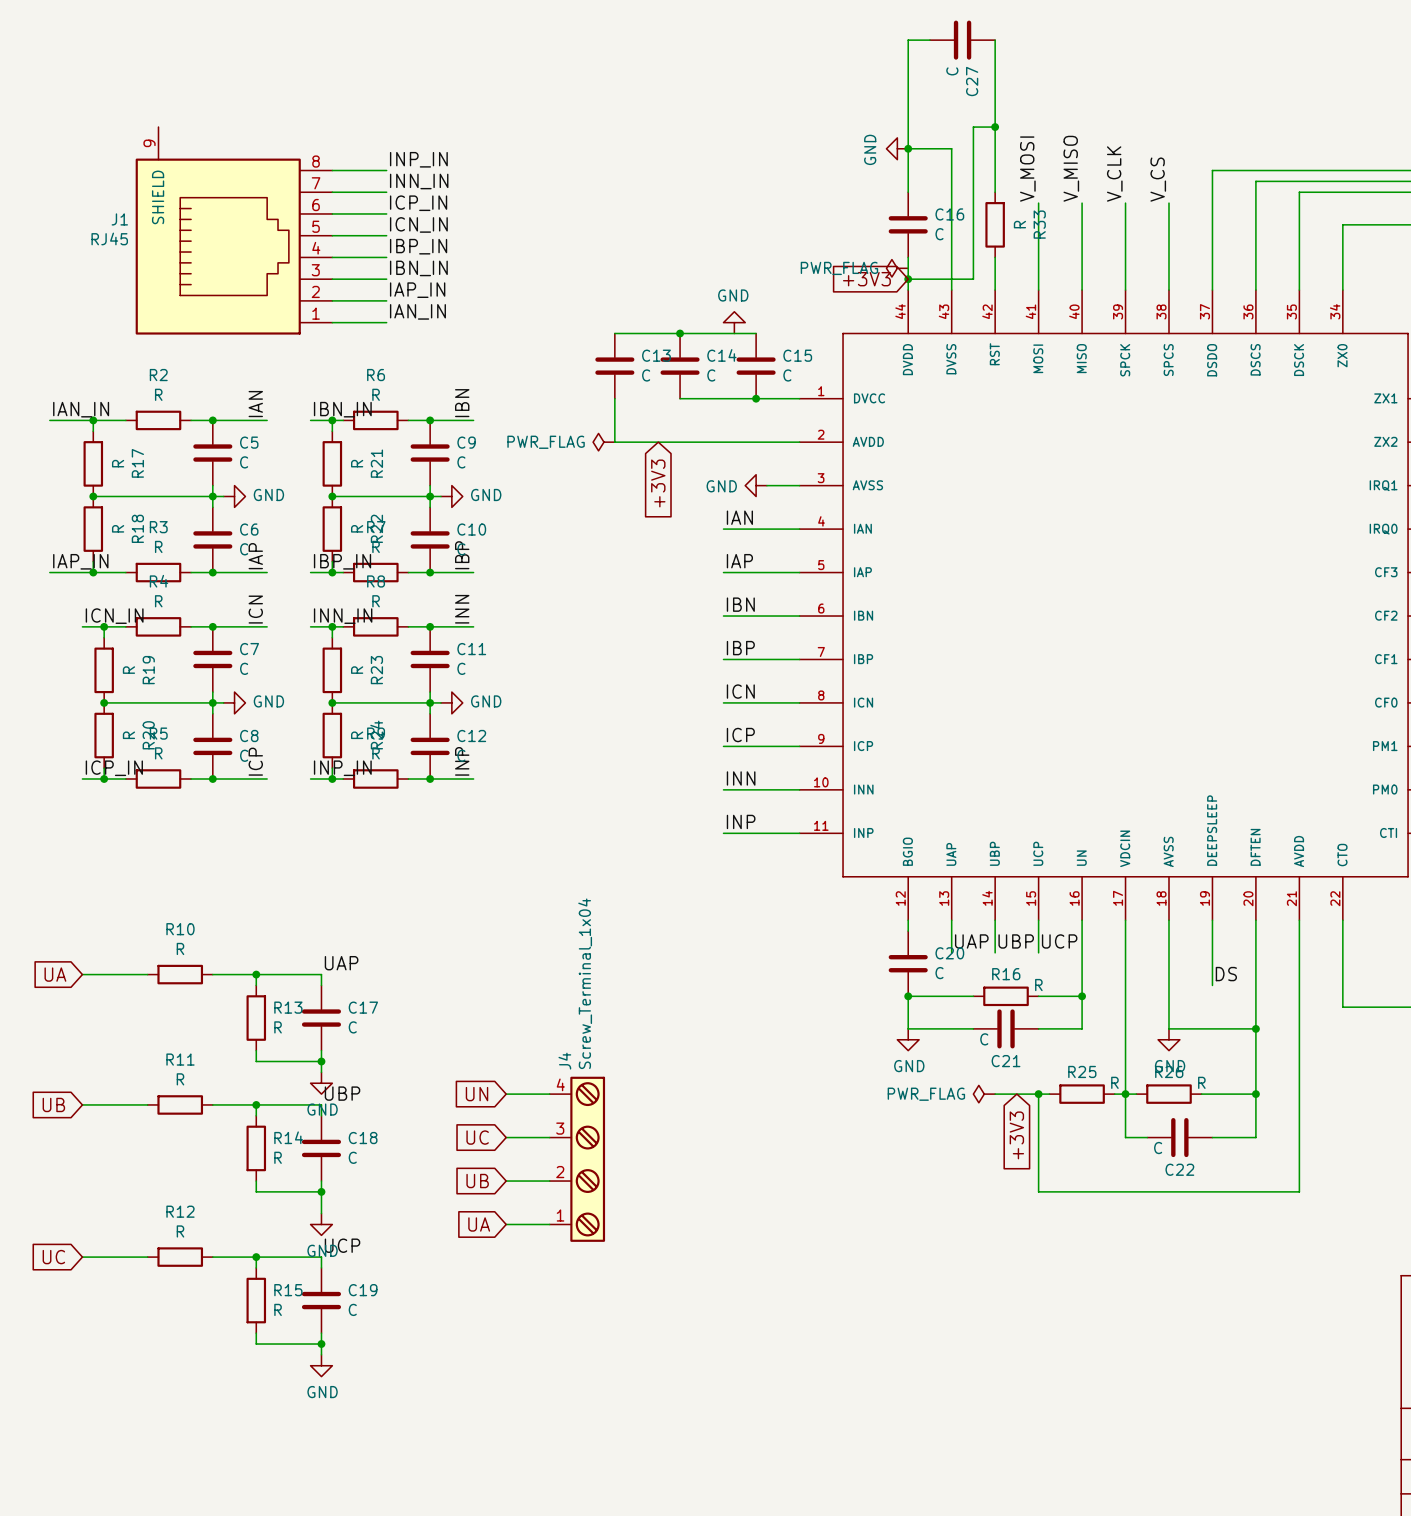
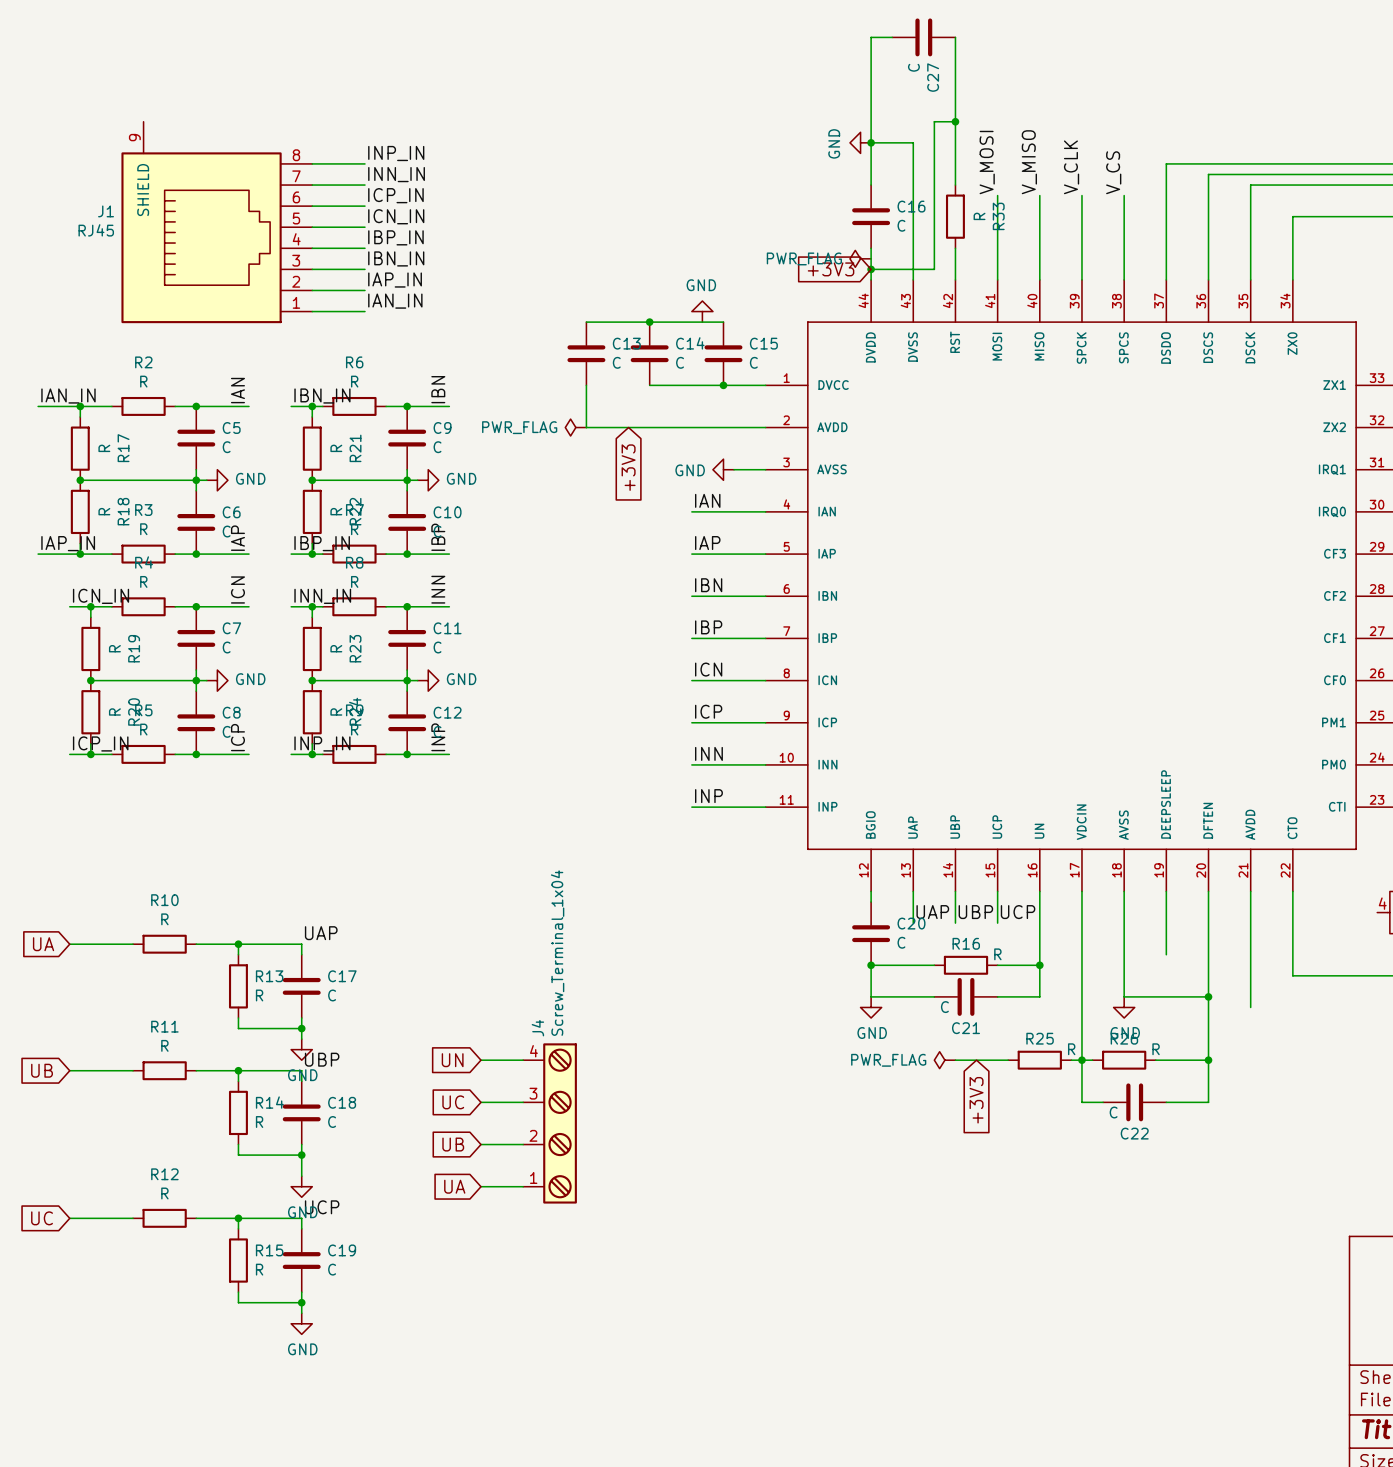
label: DS (1226, 974) -> none
wire: (1299, 1039) (1299, 1191) (1038, 1191) (1038, 1094) -> none
junction: (1038, 1094) -> none

